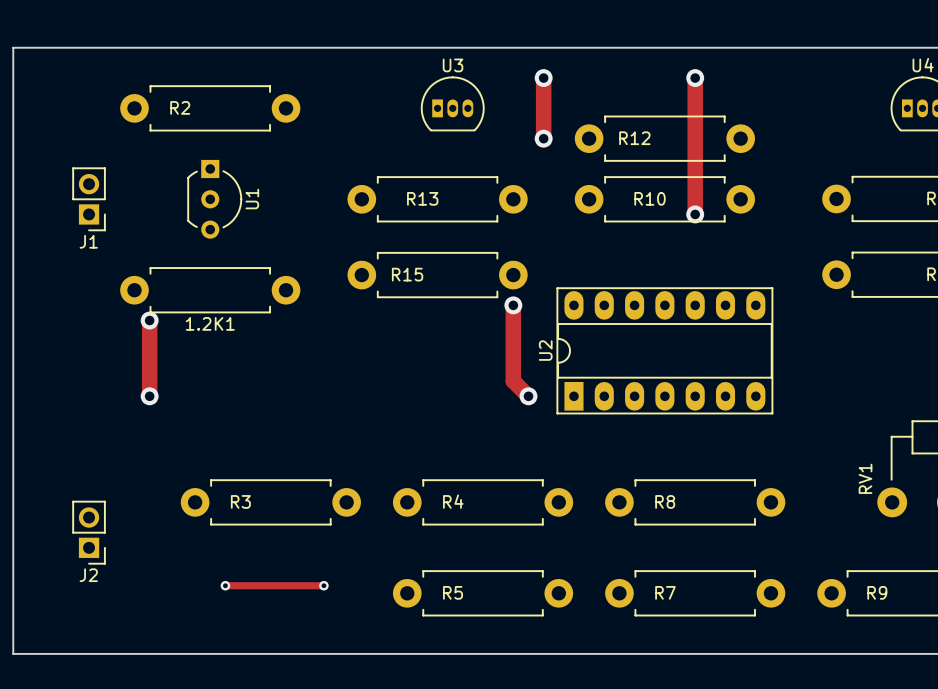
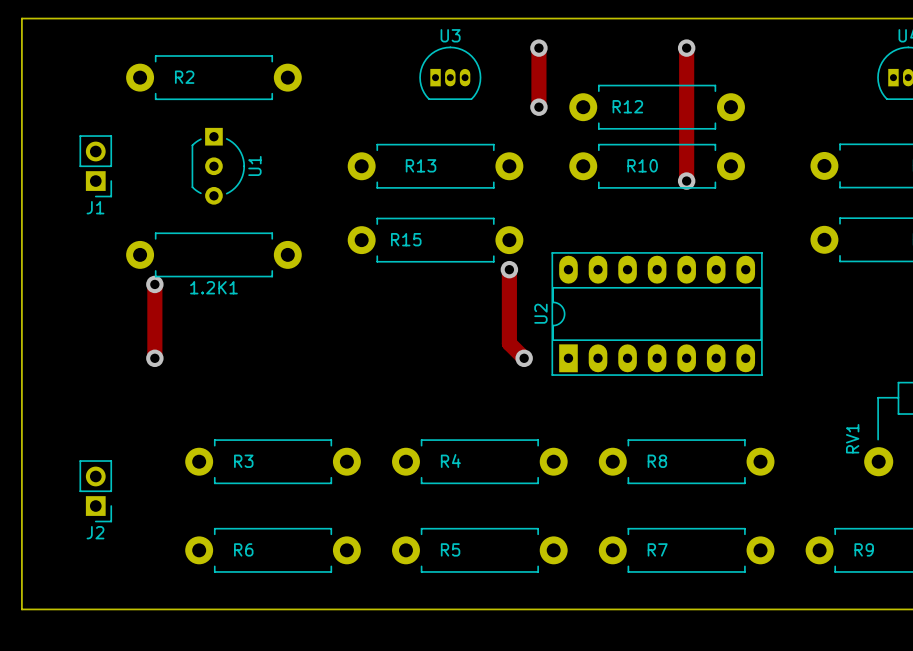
track: (225, 585) (323, 585) -> none
via: (225, 585) -> none
via: (323, 585) -> none
R6: none -> (273, 550)

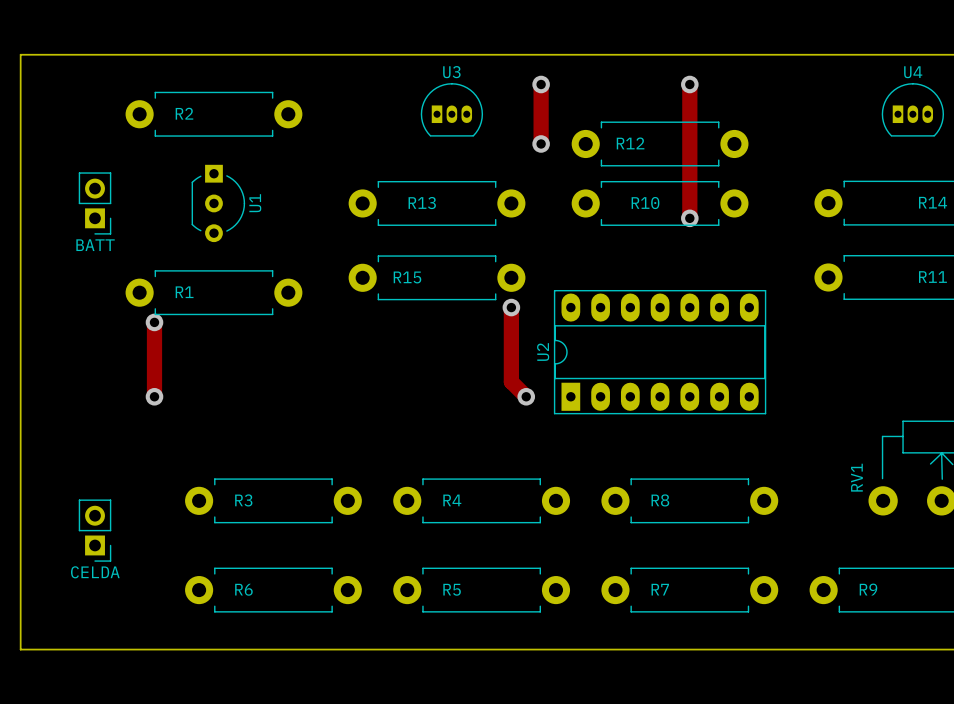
J1 name: J1 (95, 207) -> BATT (95, 245)
1.2K1 name: 1.2K1 (213, 287) -> R1 (184, 292)
J2 name: J2 (95, 532) -> CELDA (95, 572)

